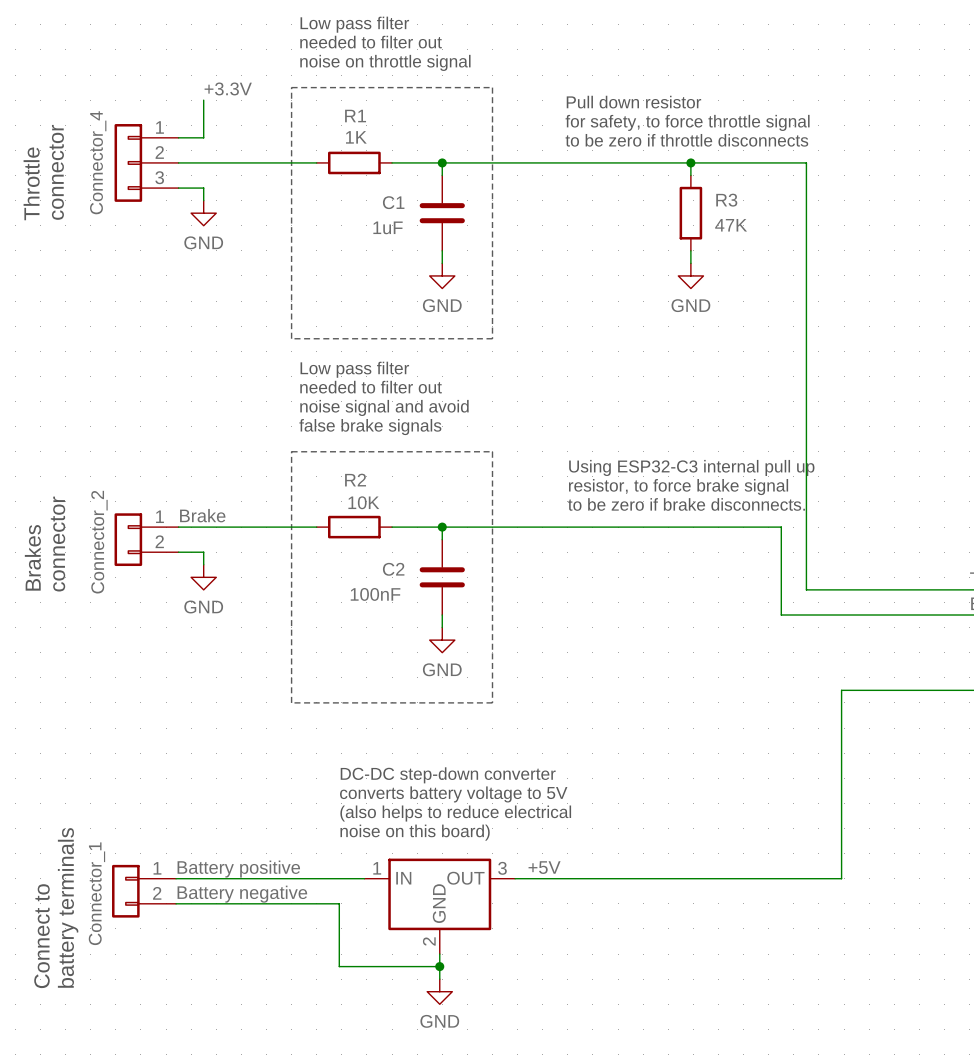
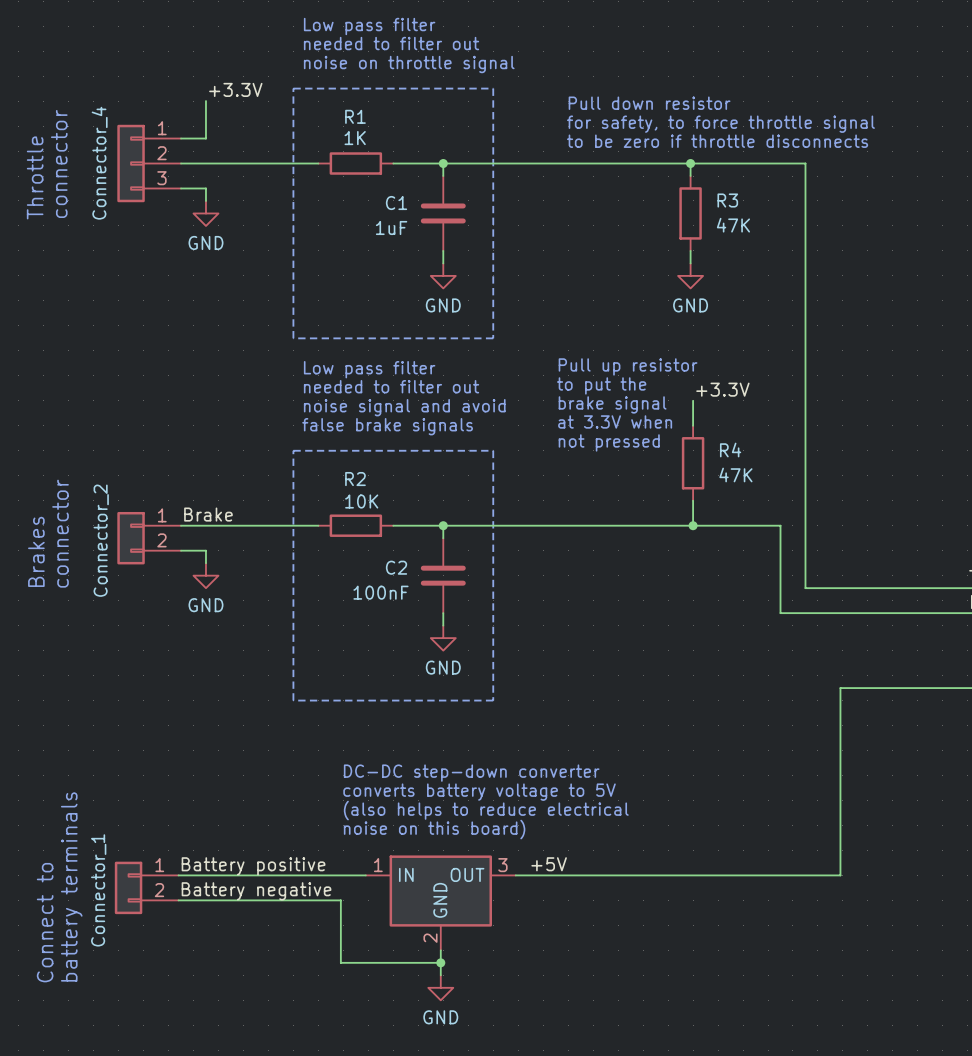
text: none -> Pull up resistor (628, 366)
text: none -> to put the (601, 385)
label: none -> +3.3V (722, 389)
wire: none -> (693, 400) (693, 425)
text: none -> brake signal (612, 404)
text: none -> at 3.3V when (615, 421)
text: none -> not pressed (609, 442)
R4: none -> 47K (693, 463)
text: Using ESP32-C3 internal pull up (691, 467) -> none
text: resistor, to force brake signal (678, 487) -> none
wire: none -> (693, 500) (693, 525)
text: to be zero if brake disconnects. (686, 504) -> none
junction: none -> (693, 525)

